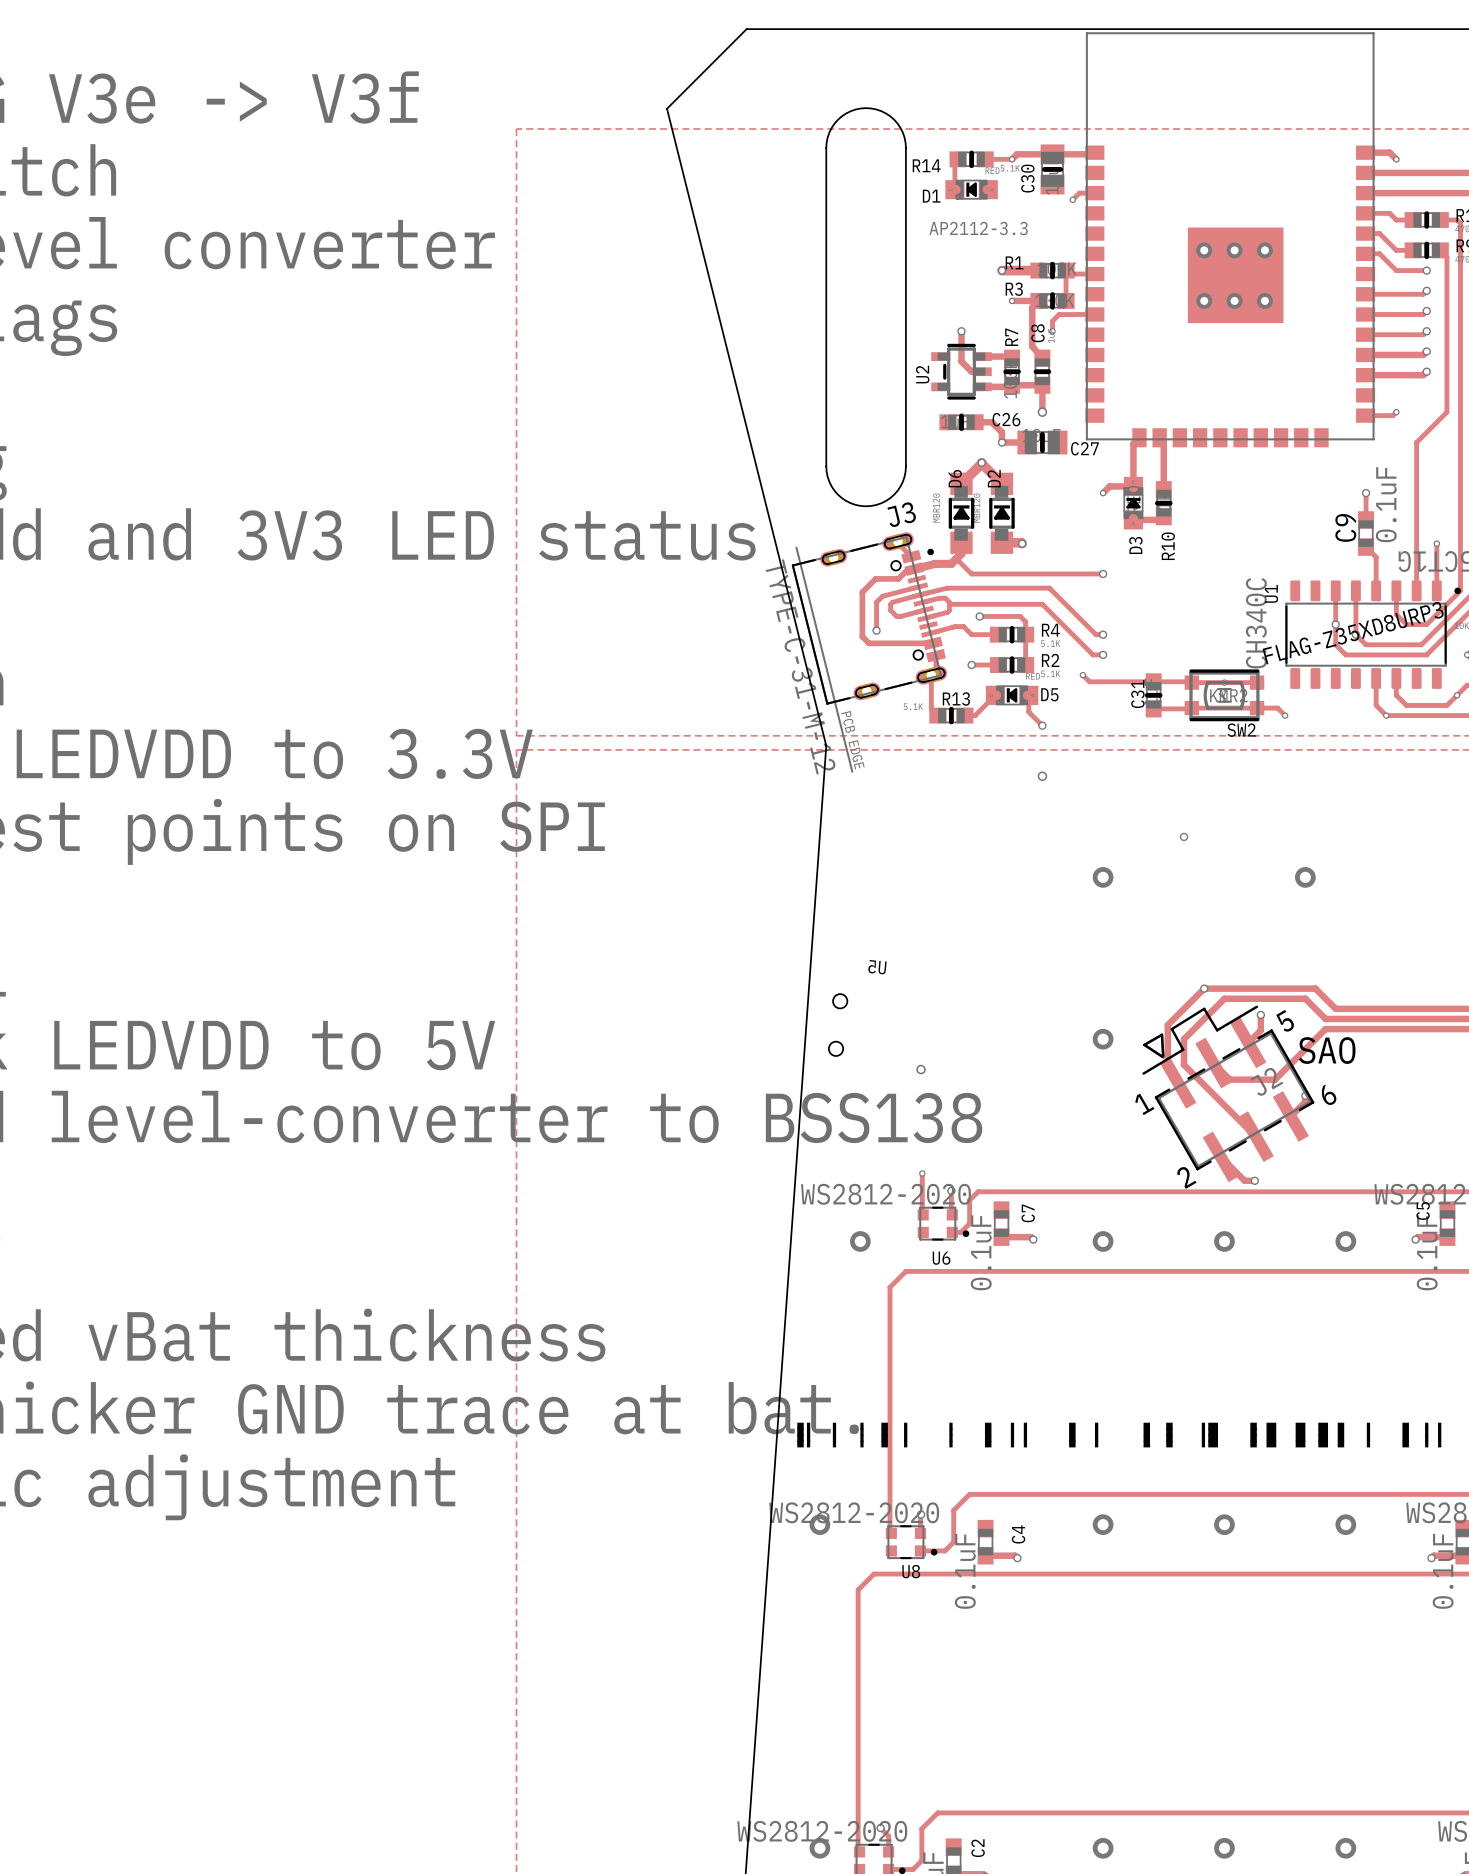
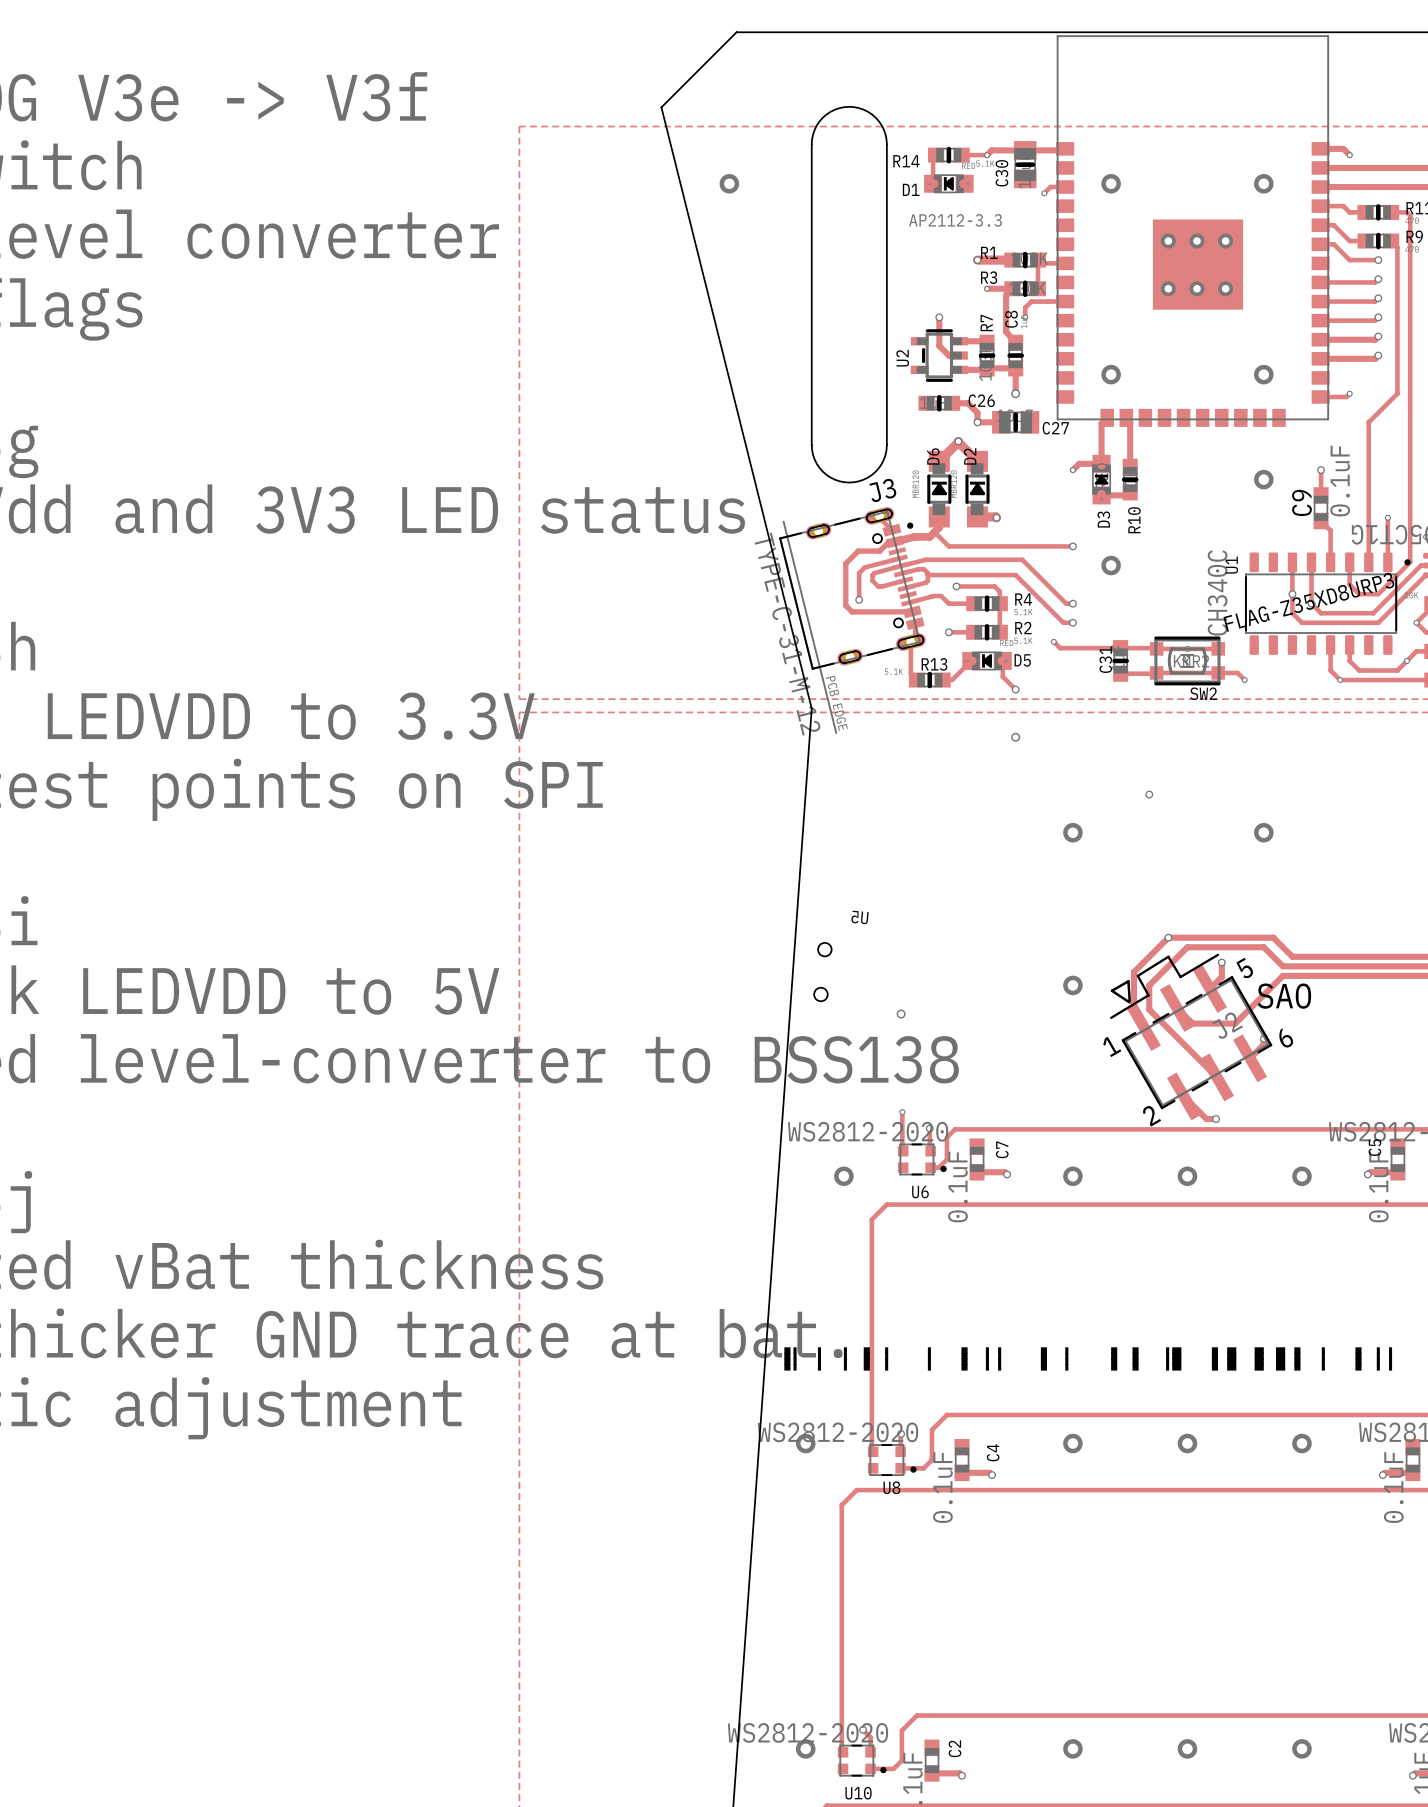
via: none -> (729, 183)
via: none -> (1111, 183)
via: none -> (1263, 183)
via: none -> (1111, 374)
via: none -> (1263, 374)
via: none -> (1263, 479)
via: none -> (1111, 565)

